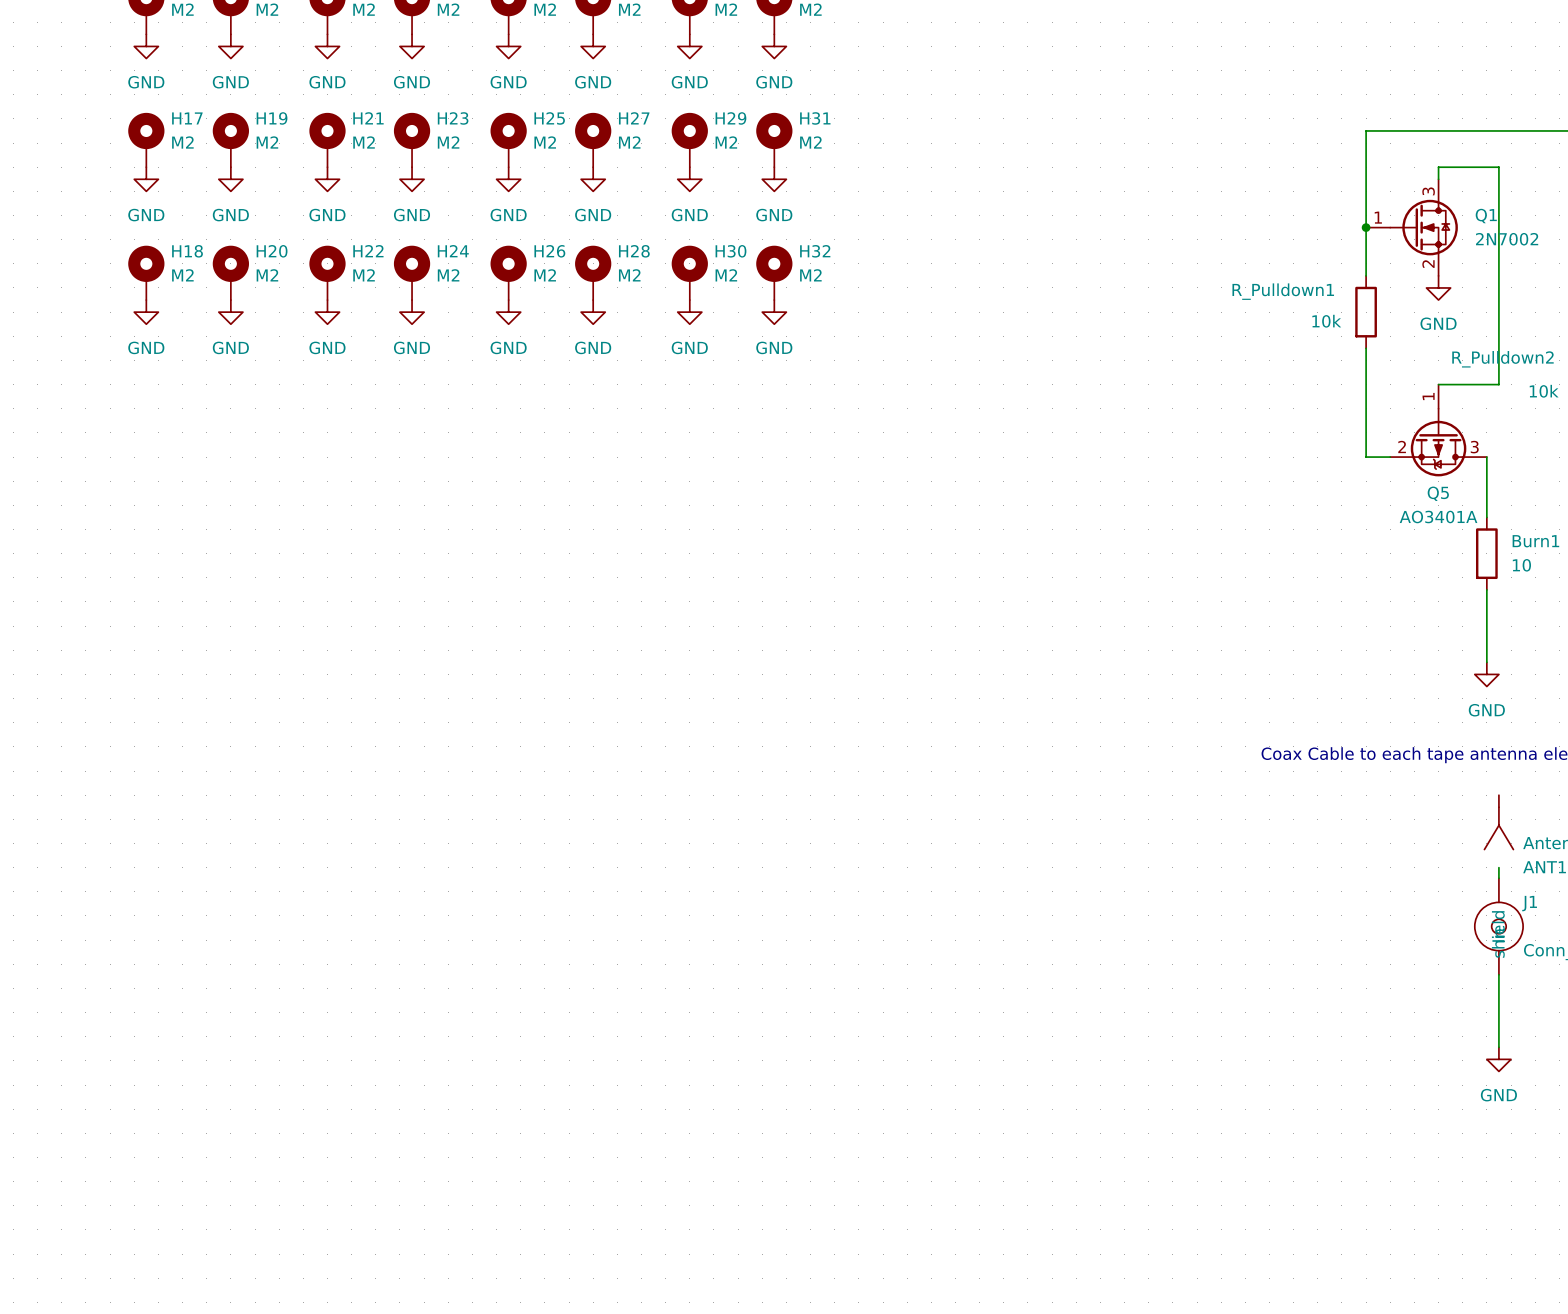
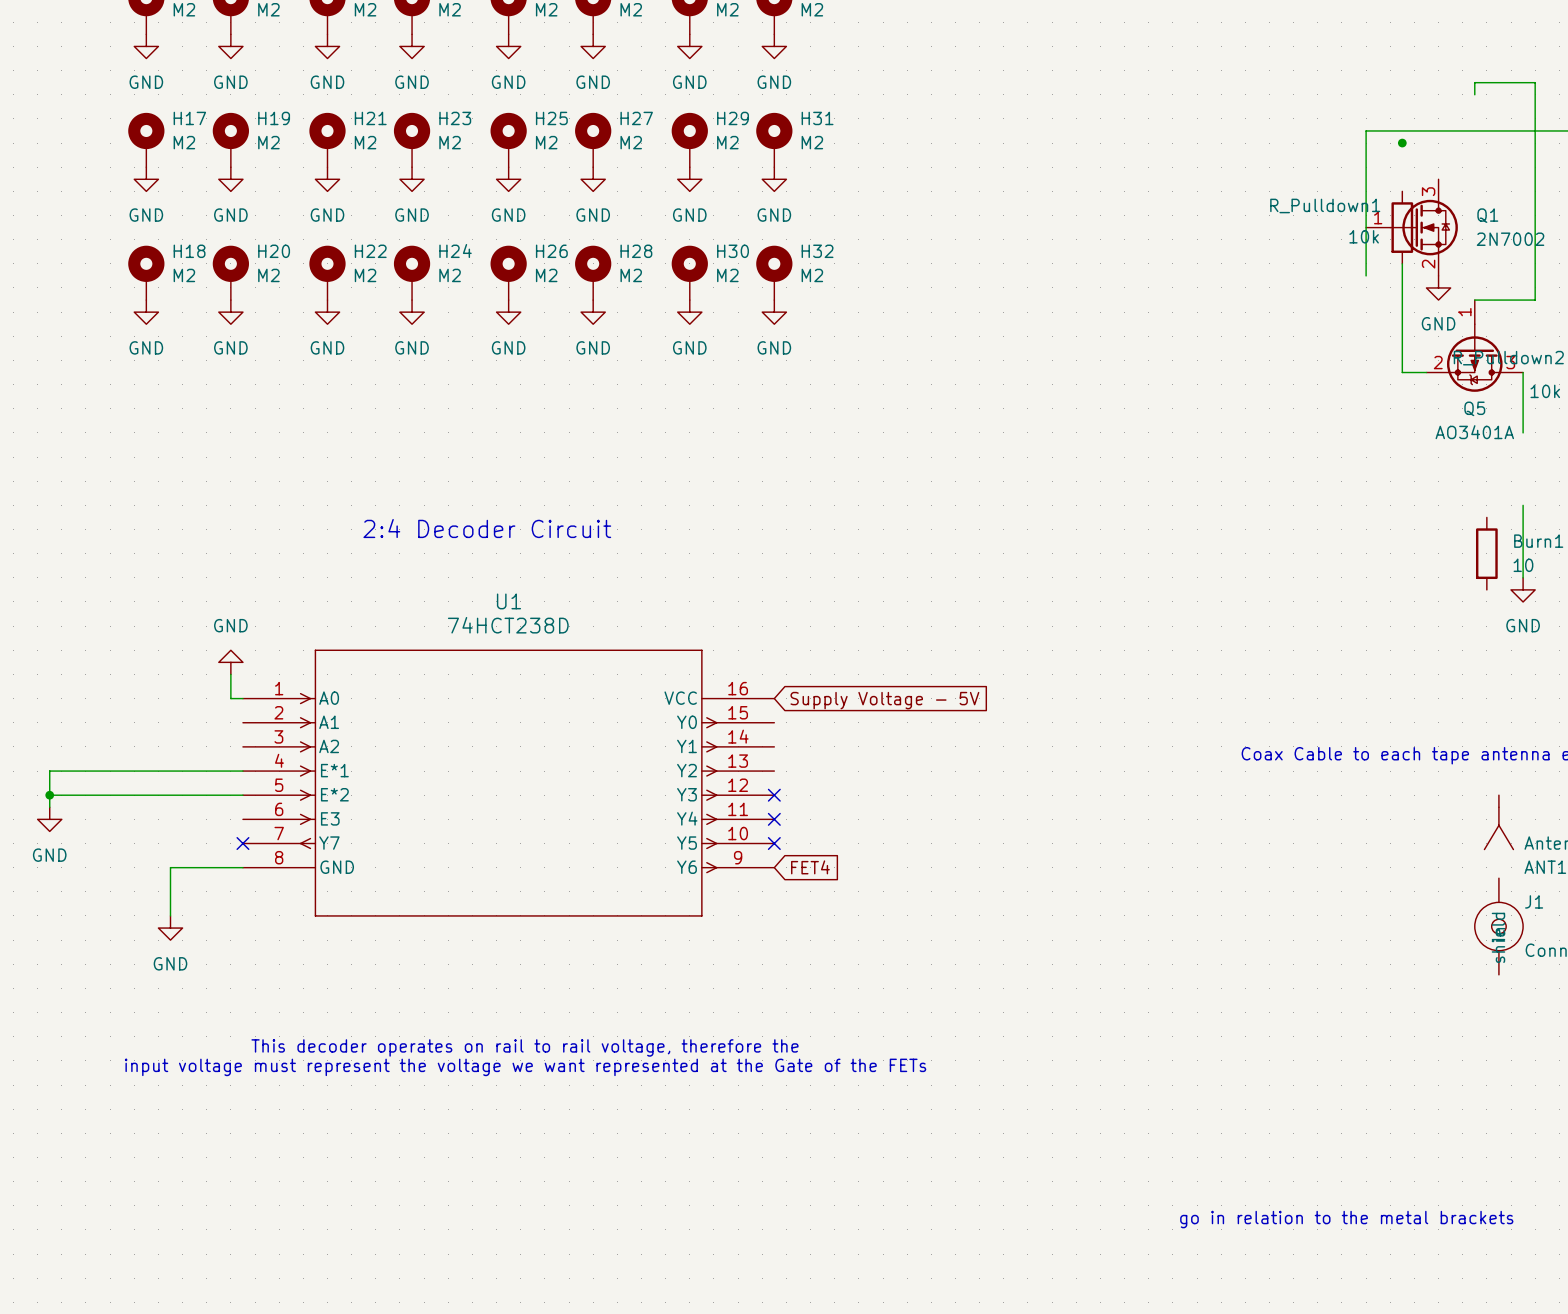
junction: none -> (1402, 143)
wire: (1438, 179) (1438, 167) (1498, 167) (1498, 384) (1438, 384) -> (1474, 94) (1474, 82) (1535, 82) (1535, 300) (1474, 300)
junction: (1366, 227) -> none
R_Pulldown1 position: (1366, 312) -> (1402, 227)
wire: (1366, 348) (1366, 457) (1390, 457) -> (1402, 263) (1402, 372) (1426, 372)
Q5 position: (1438, 430) -> (1474, 345)
wire: (1486, 457) (1486, 517) -> (1523, 372) (1523, 432)
text: none -> 2:4 Decoder Circuit (487, 528)
wire: (1486, 589) (1486, 662) -> (1523, 505) (1523, 577)
power symbol: none -> GND (230, 662)
wire: none -> (230, 674) (230, 698) (242, 698)
power symbol position: GND (1486, 674) -> GND (1523, 589)
global label: none -> Supply Voltage - 5V (884, 700)
wire: none -> (242, 771) (49, 771) (49, 807)
U1: none -> 74HCT238D (508, 783)
wire: none -> (49, 795) (242, 795)
junction: none -> (49, 795)
no-connect mark: none -> (774, 795)
power symbol: none -> GND (49, 819)
no-connect mark: none -> (774, 819)
no-connect mark: none -> (242, 843)
no-connect mark: none -> (774, 843)
wire: none -> (242, 867) (170, 867) (170, 915)
global label: none -> FET4 (810, 867)
wire: (1498, 867) (1498, 878) -> none
power symbol: none -> GND (170, 928)
wire: (1498, 974) (1498, 1047) -> none
text: none -> This decoder operates on rail to rail voltage, therefore the (524, 1047)
power symbol: GND (1498, 1059) -> none
text: none -> input voltage must represent the voltage we want represented at the Gate of the FETs (525, 1067)
text: none -> go in relation to the metal brackets (1346, 1219)

